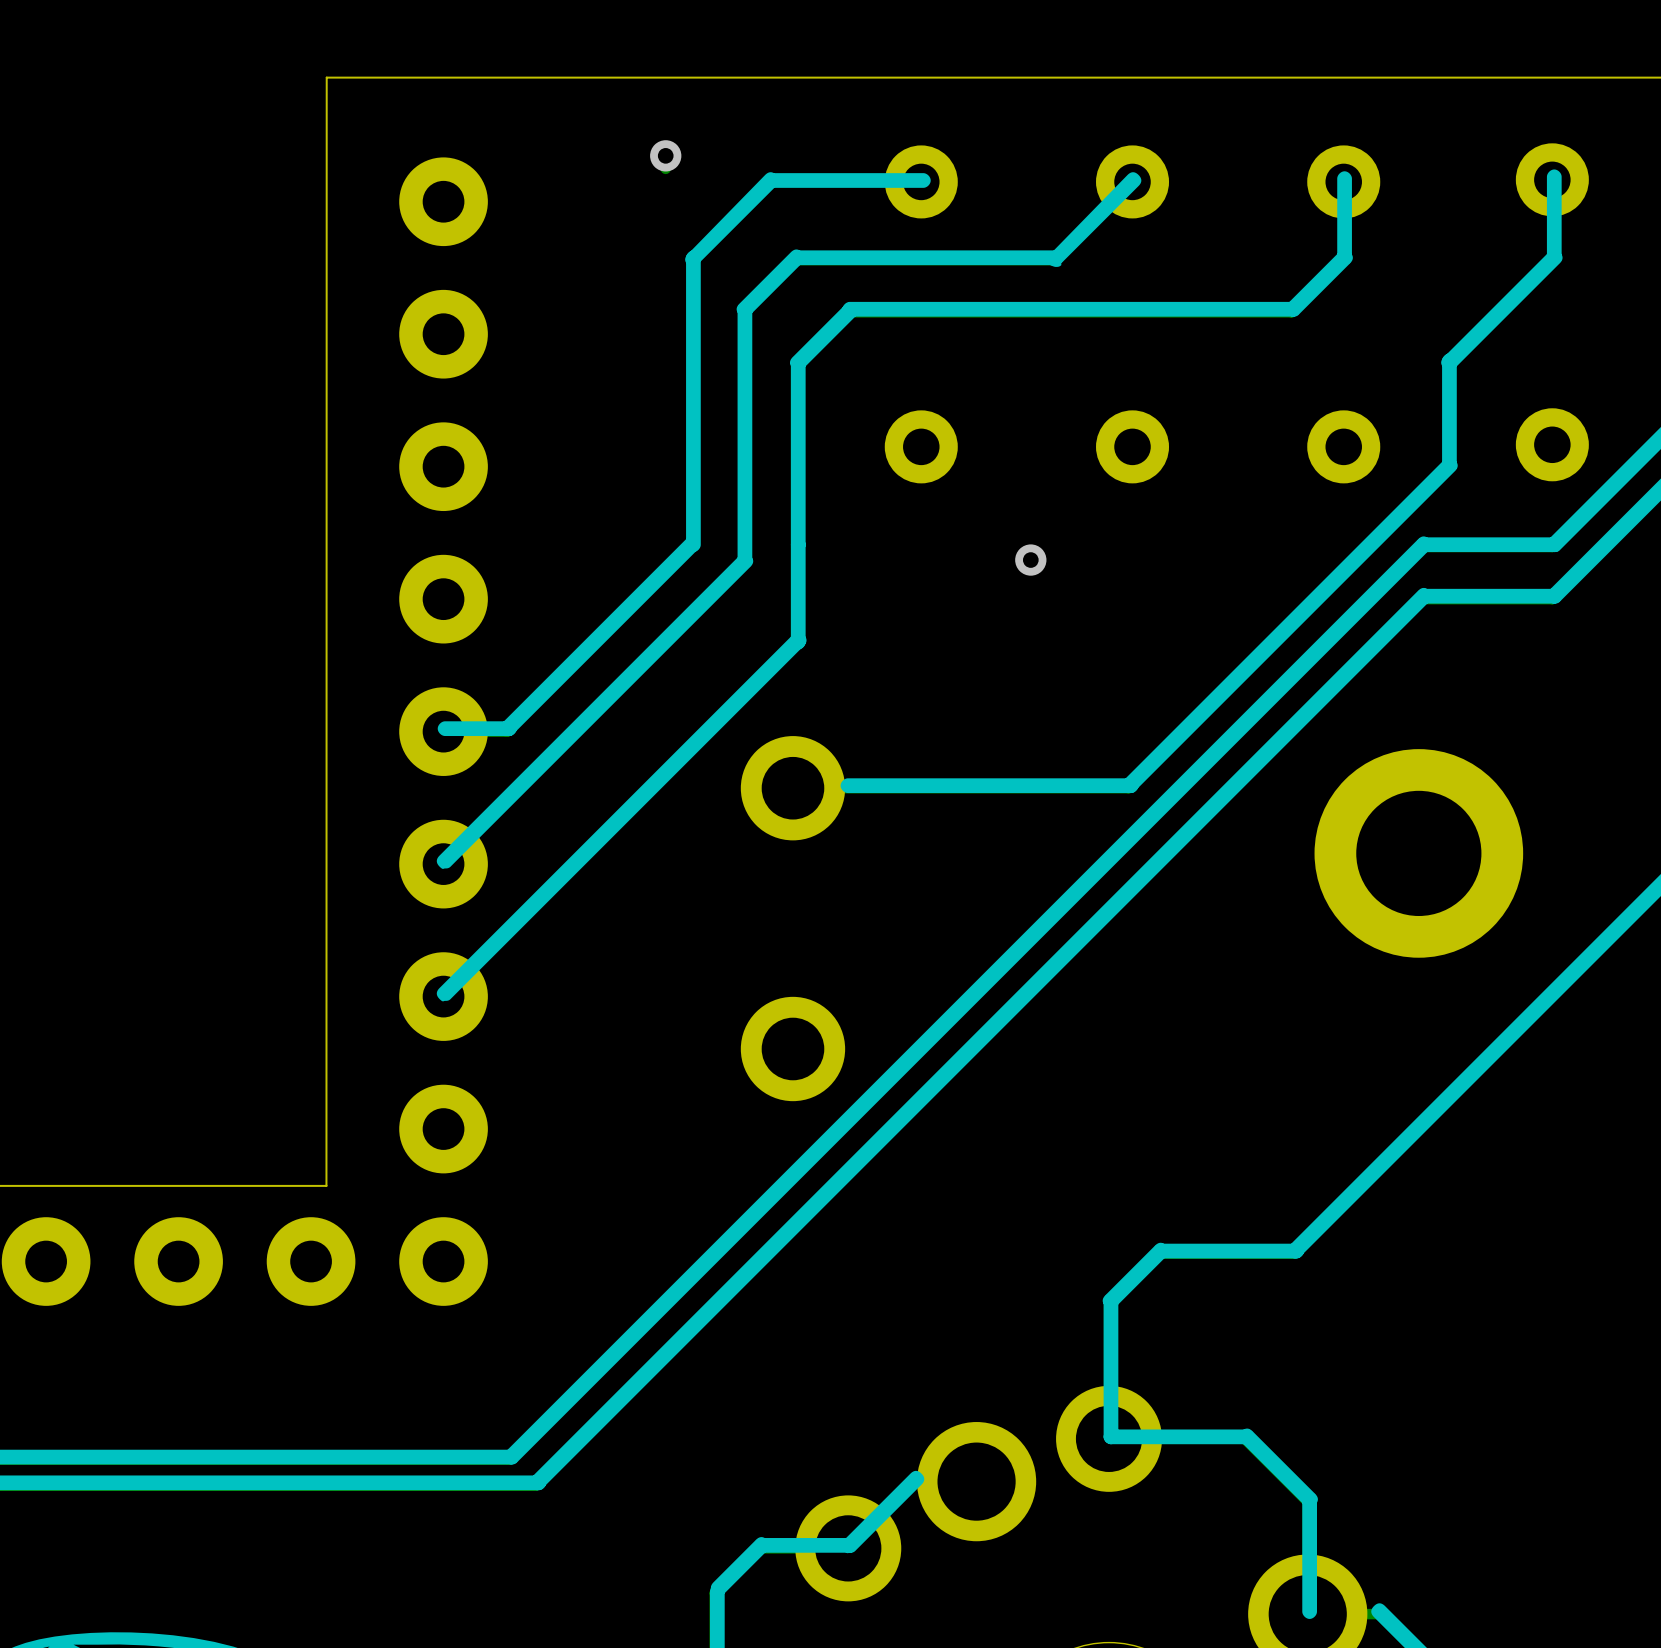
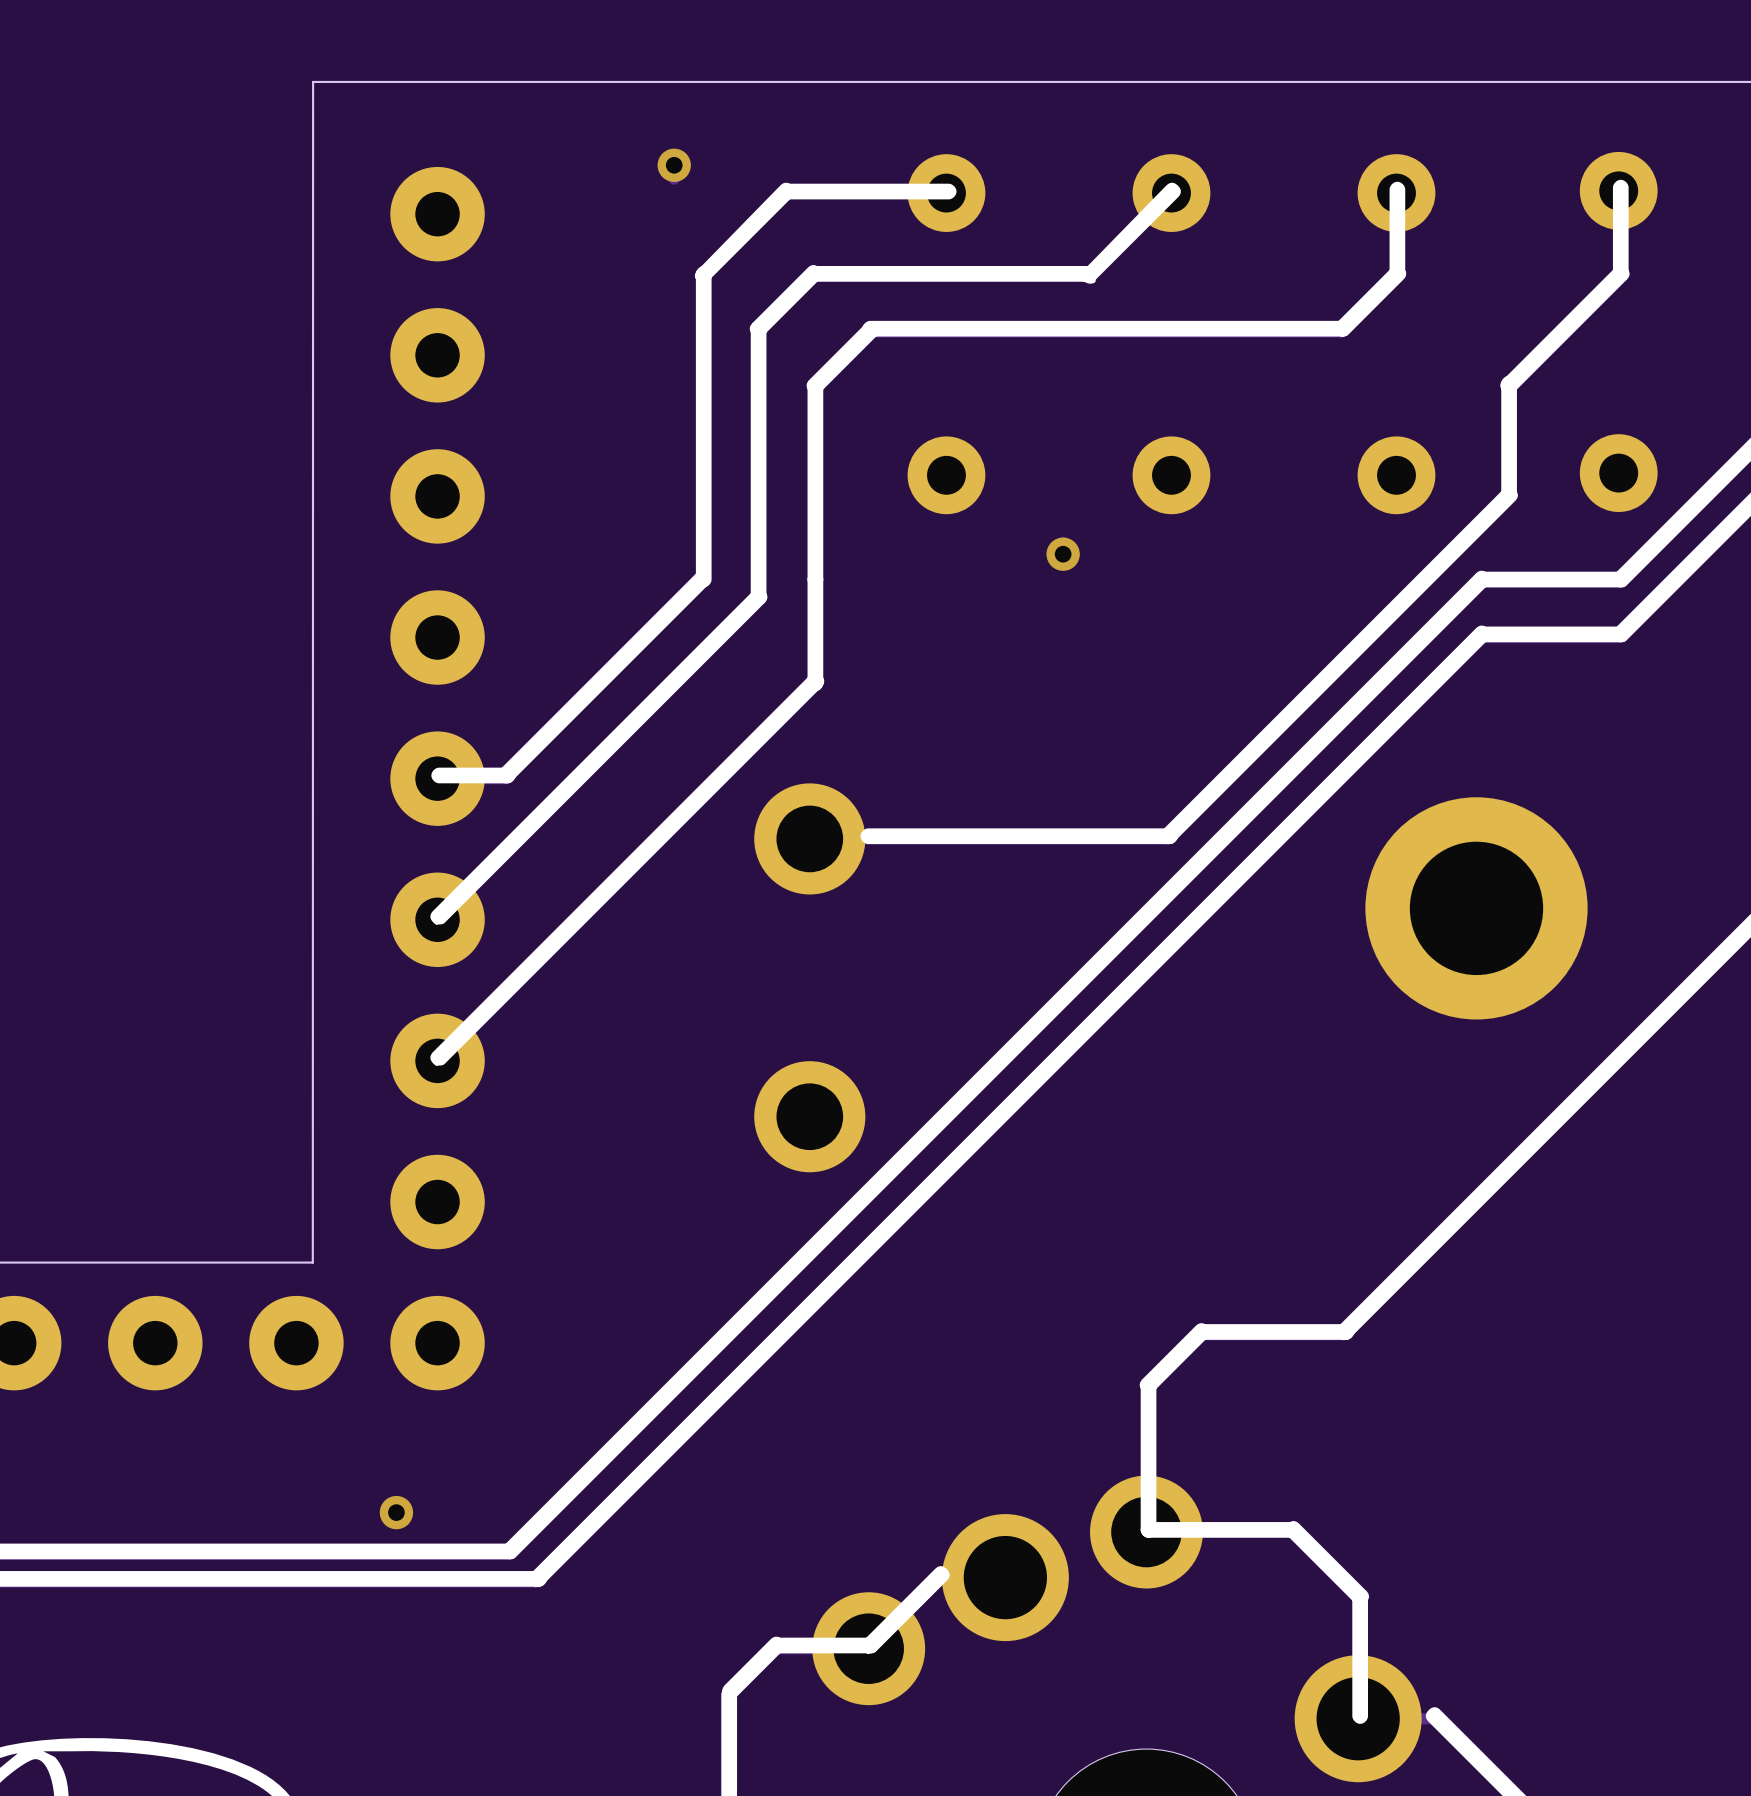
via position: (1030, 560) -> (1063, 554)
via: none -> (396, 1512)

